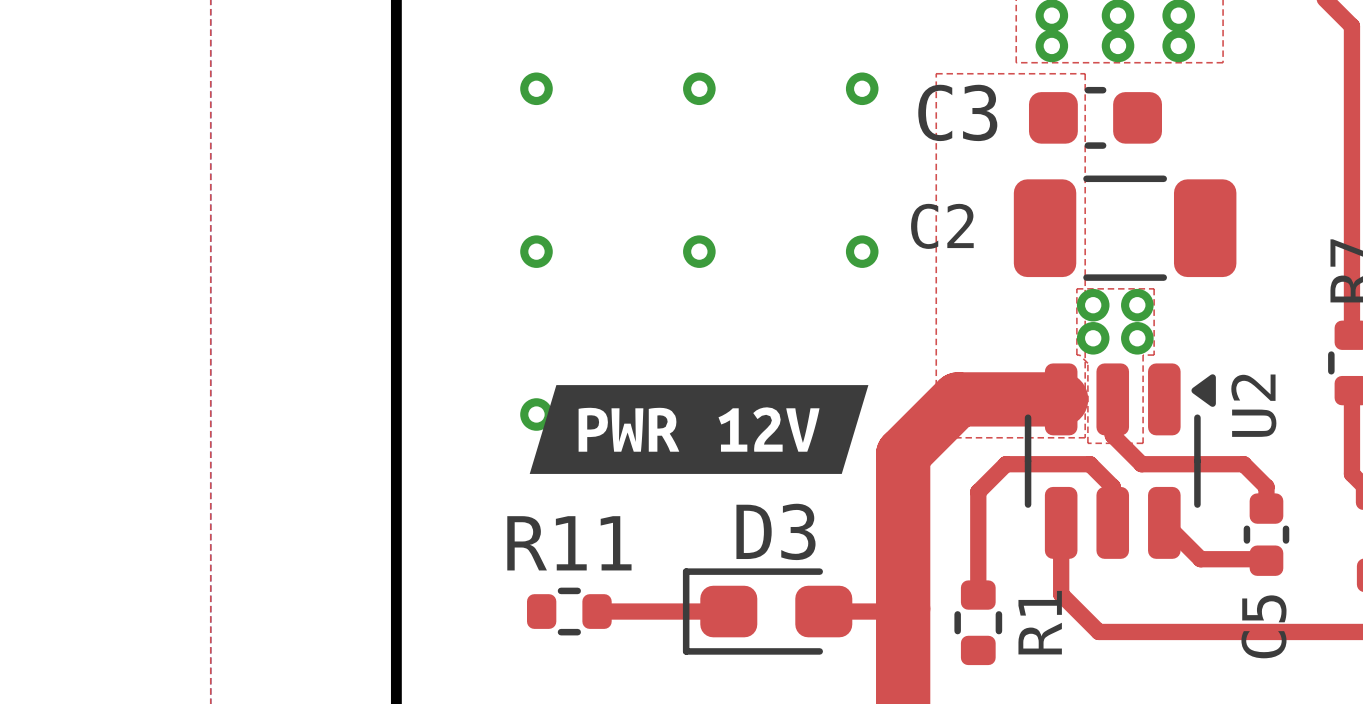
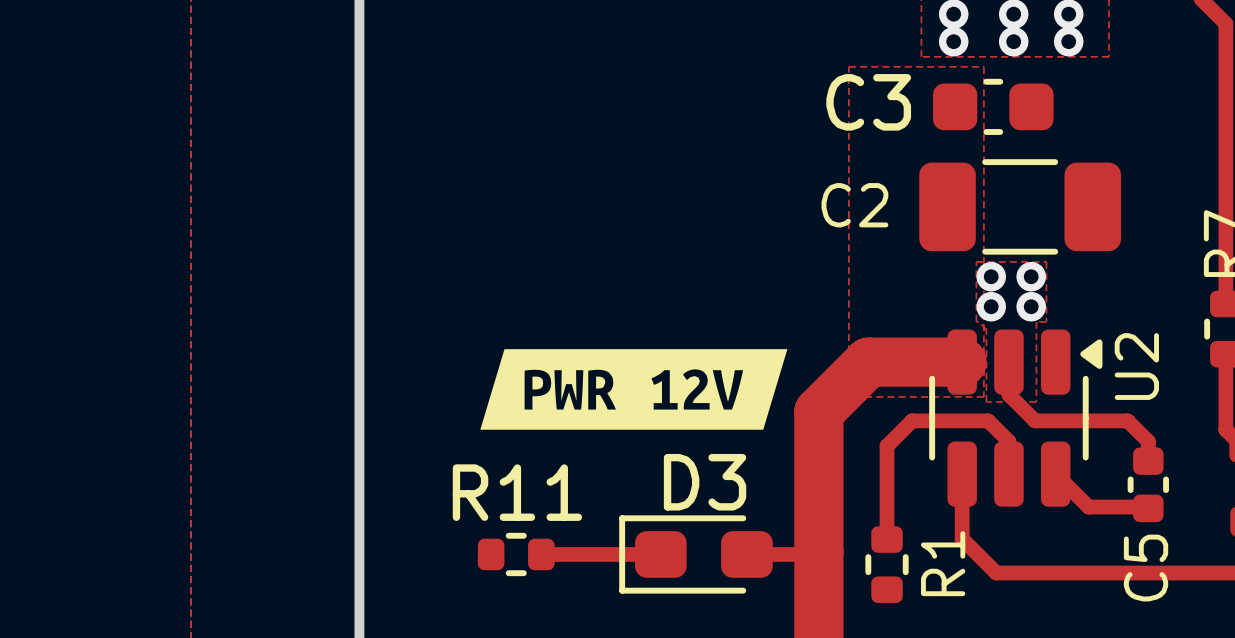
via: (536, 88) -> none
via: (699, 88) -> none
via: (862, 88) -> none
via: (536, 251) -> none
via: (699, 251) -> none
via: (862, 251) -> none
via: (536, 414) -> none

